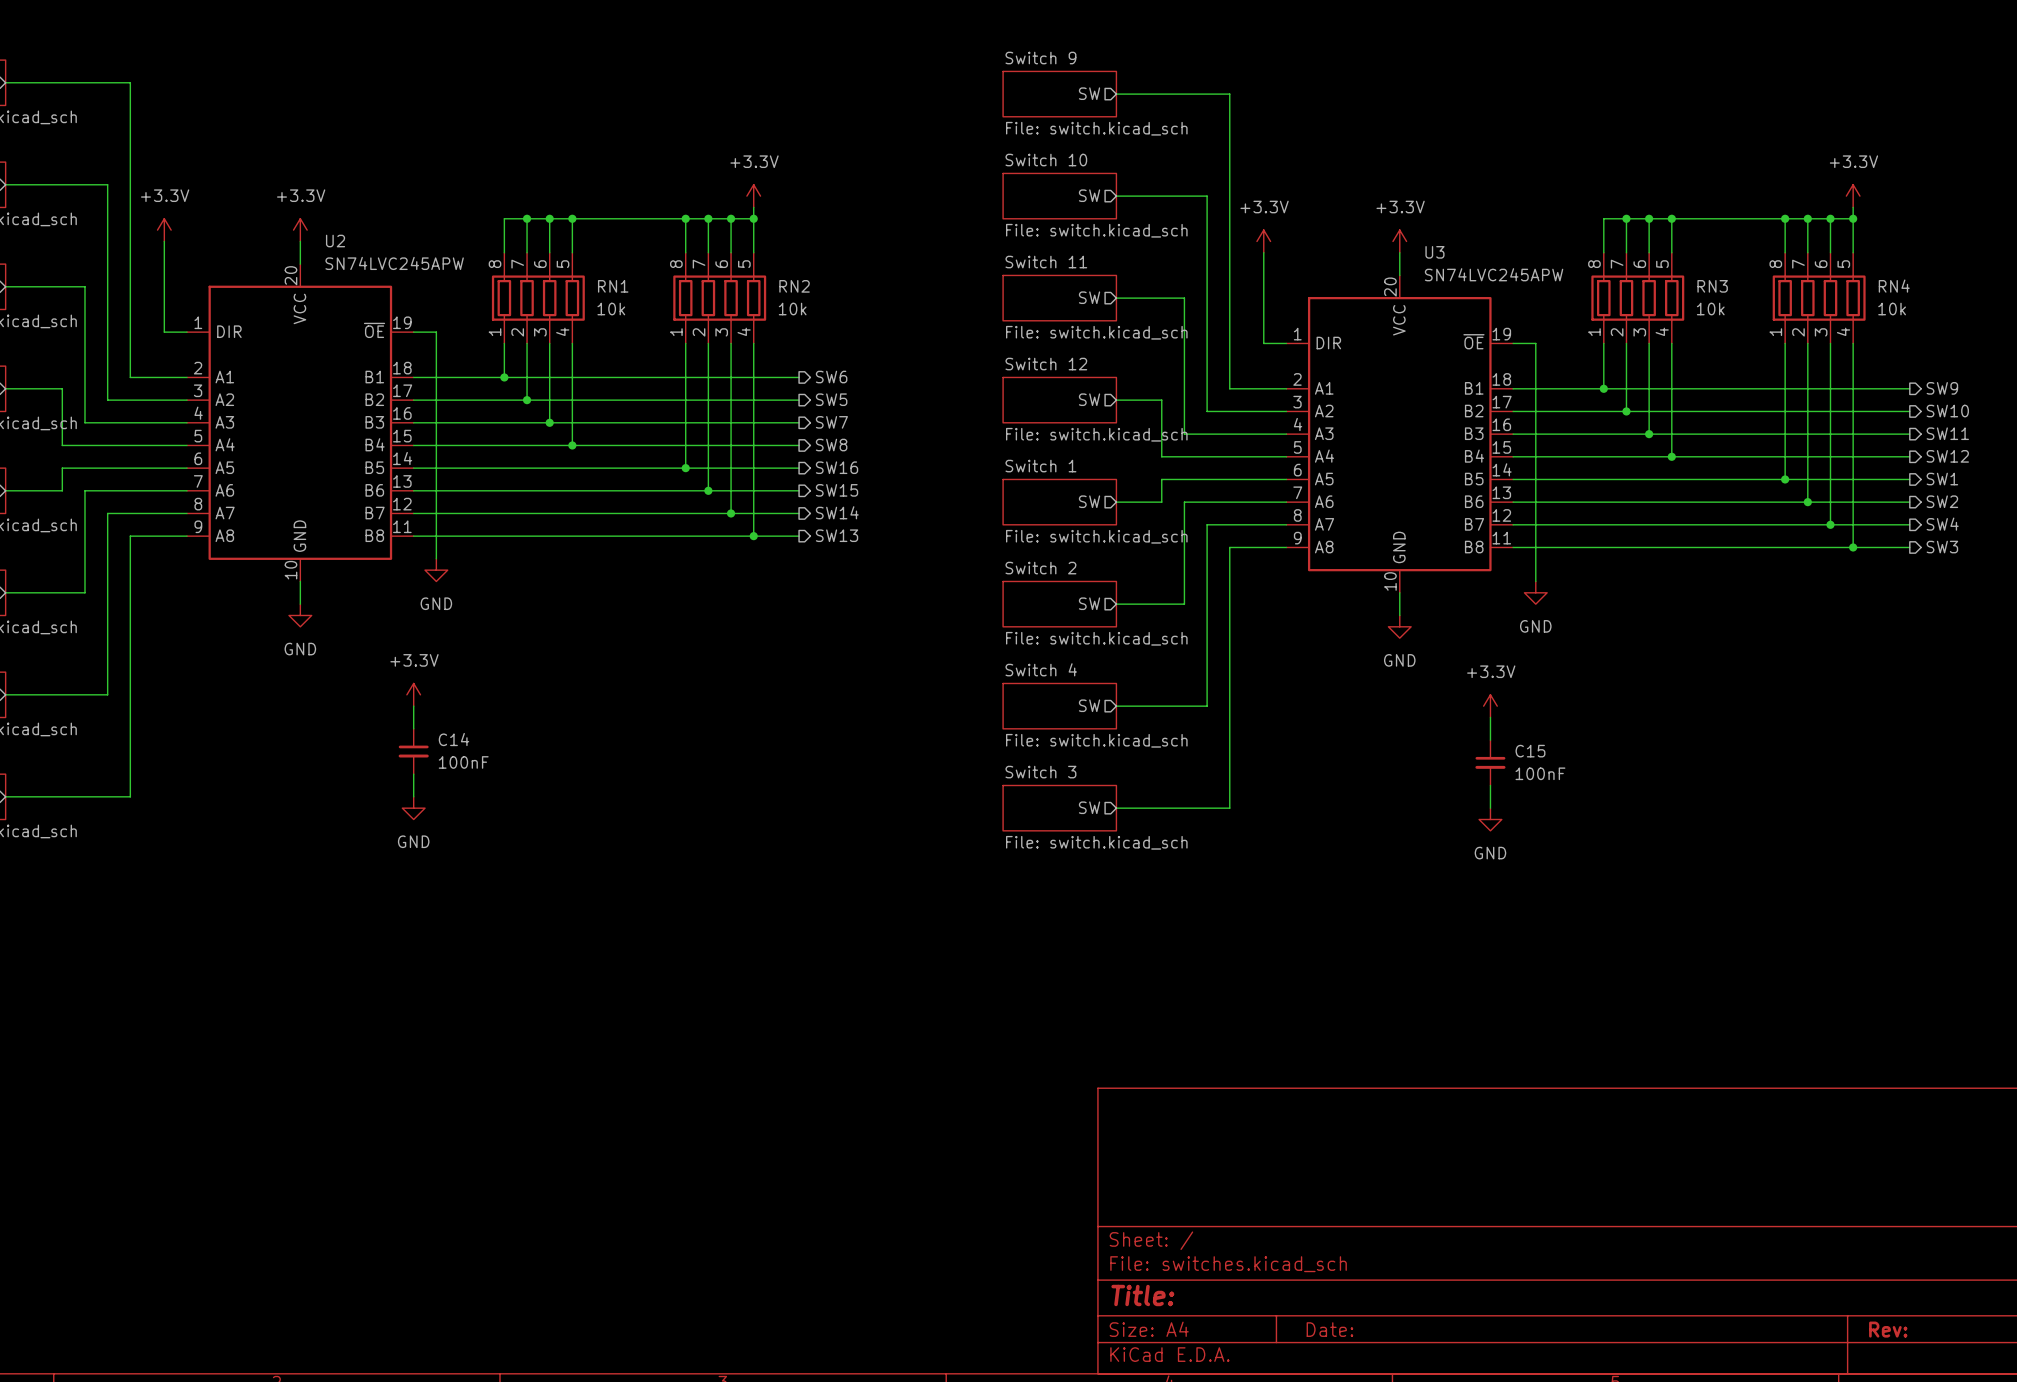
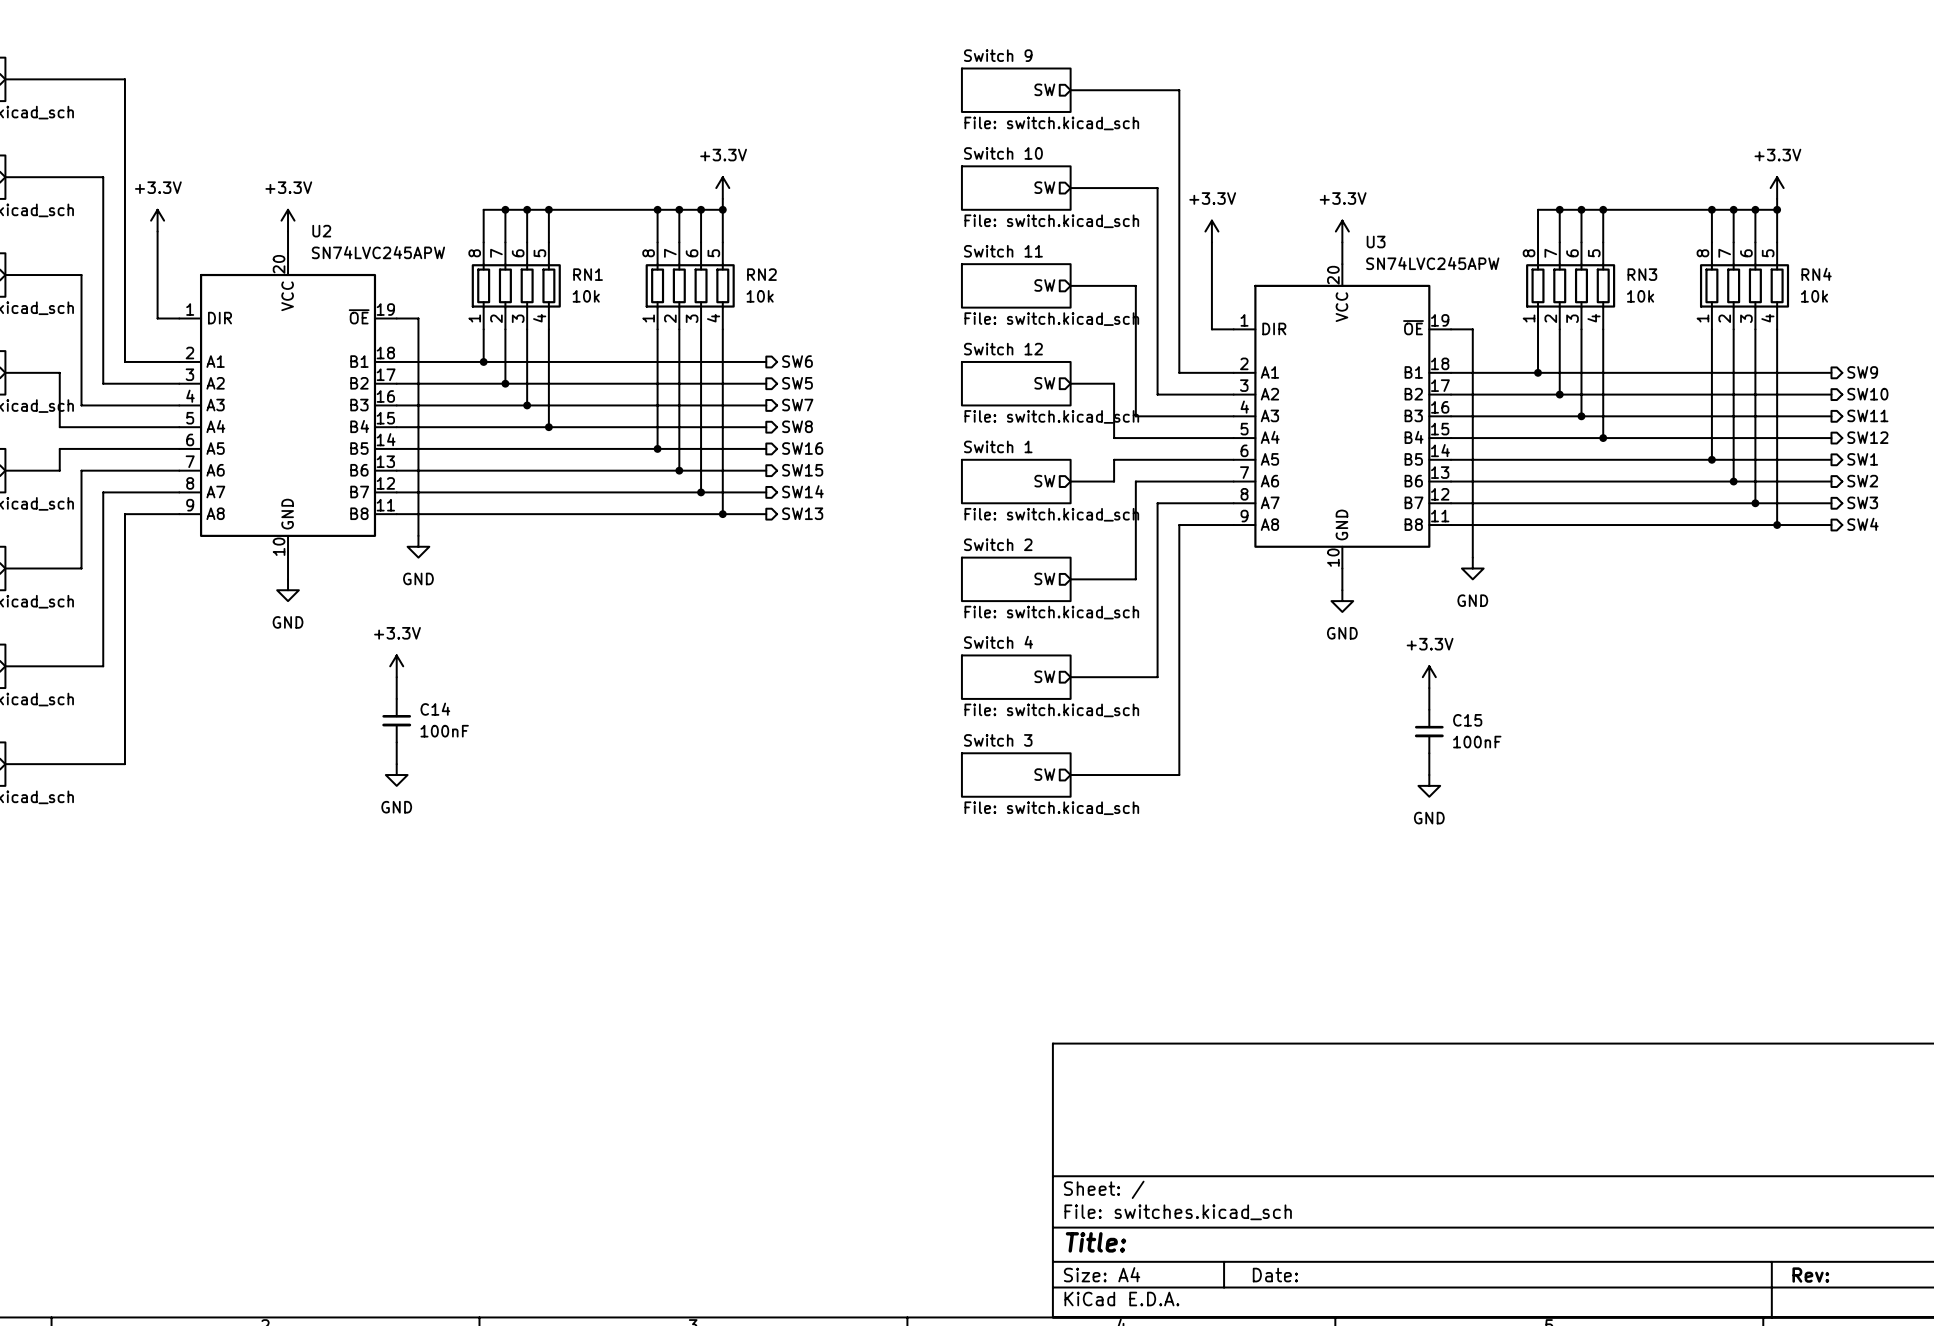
hierarchical label: SW4 (1942, 524) -> SW3 (1862, 502)
hierarchical label: SW3 (1942, 547) -> SW4 (1862, 524)

